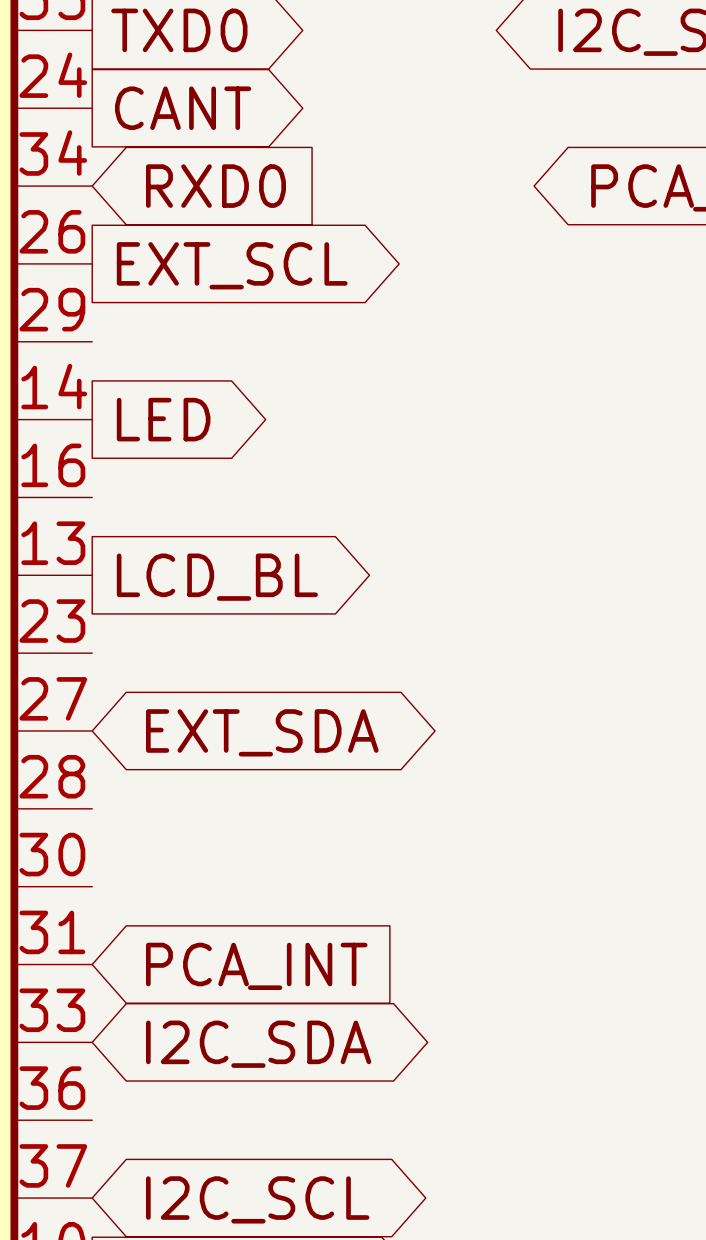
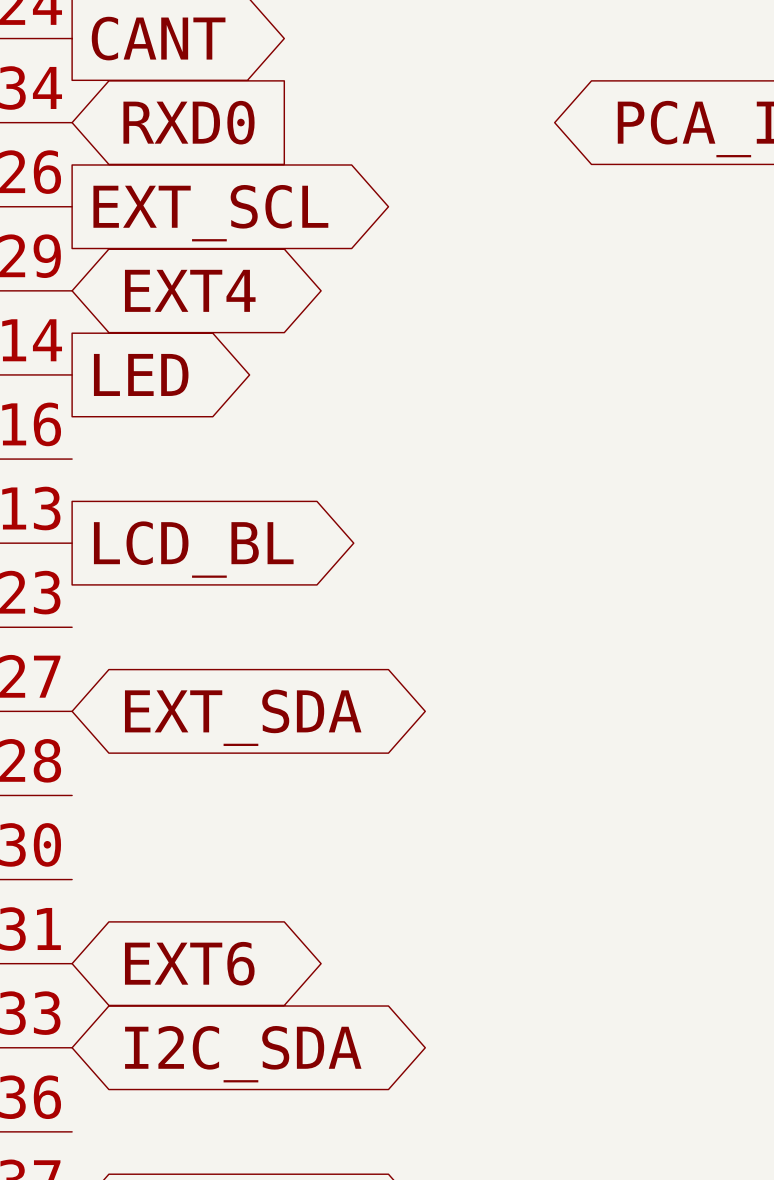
global label: none -> EXT4 (190, 290)
global label shape: input (256, 966) -> bidirectional (189, 963)
global label: PCA_INT (256, 966) -> EXT6 (189, 963)

